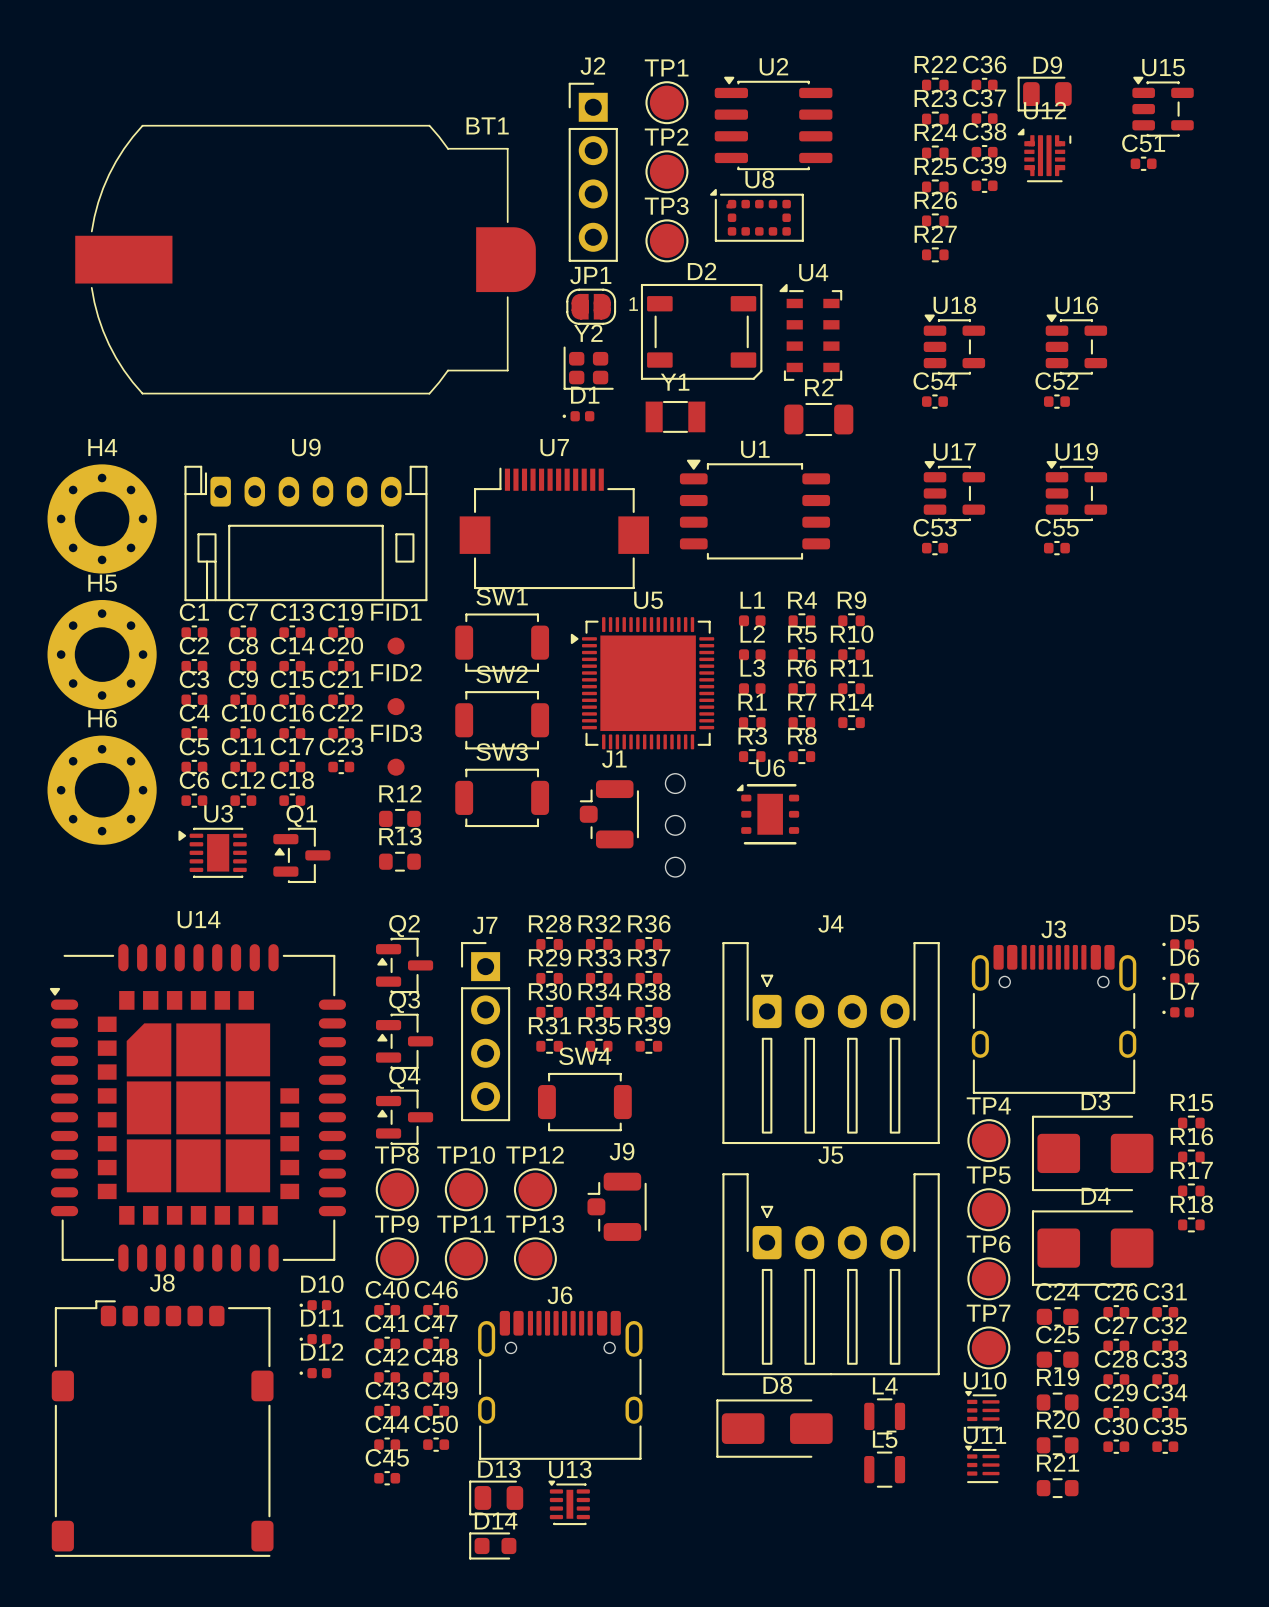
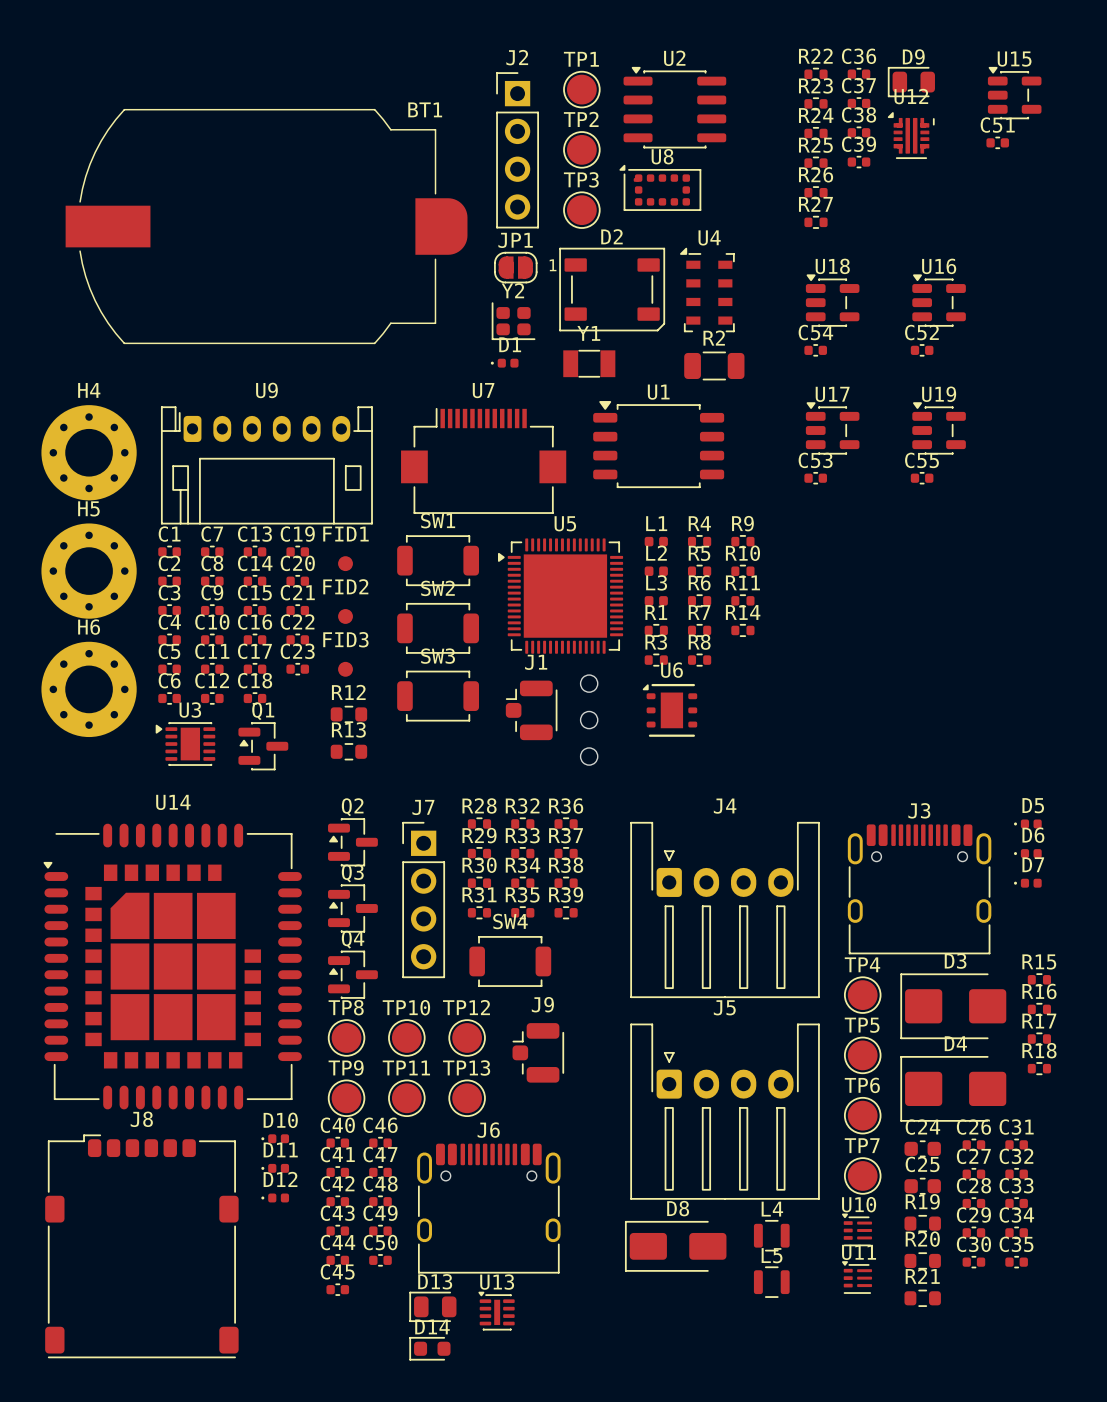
BT1 footprint: [75, 124, 536, 395] -> [65, 108, 468, 345]

